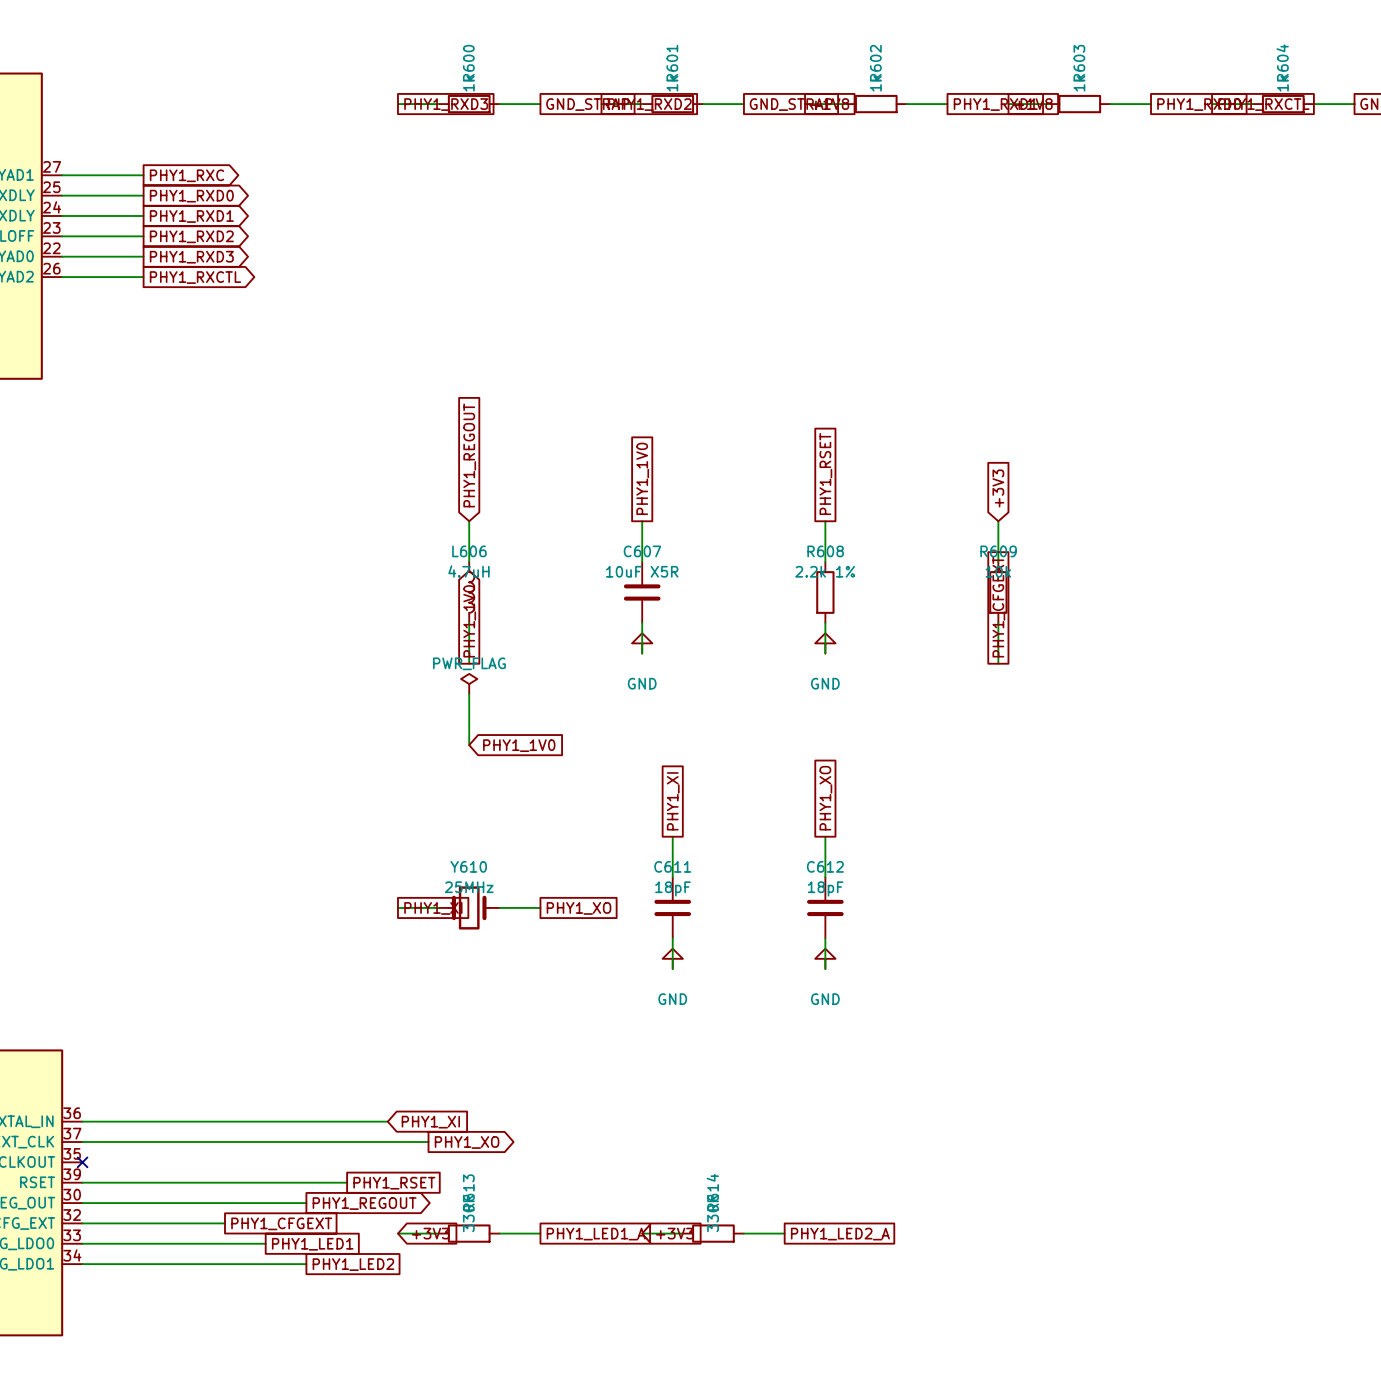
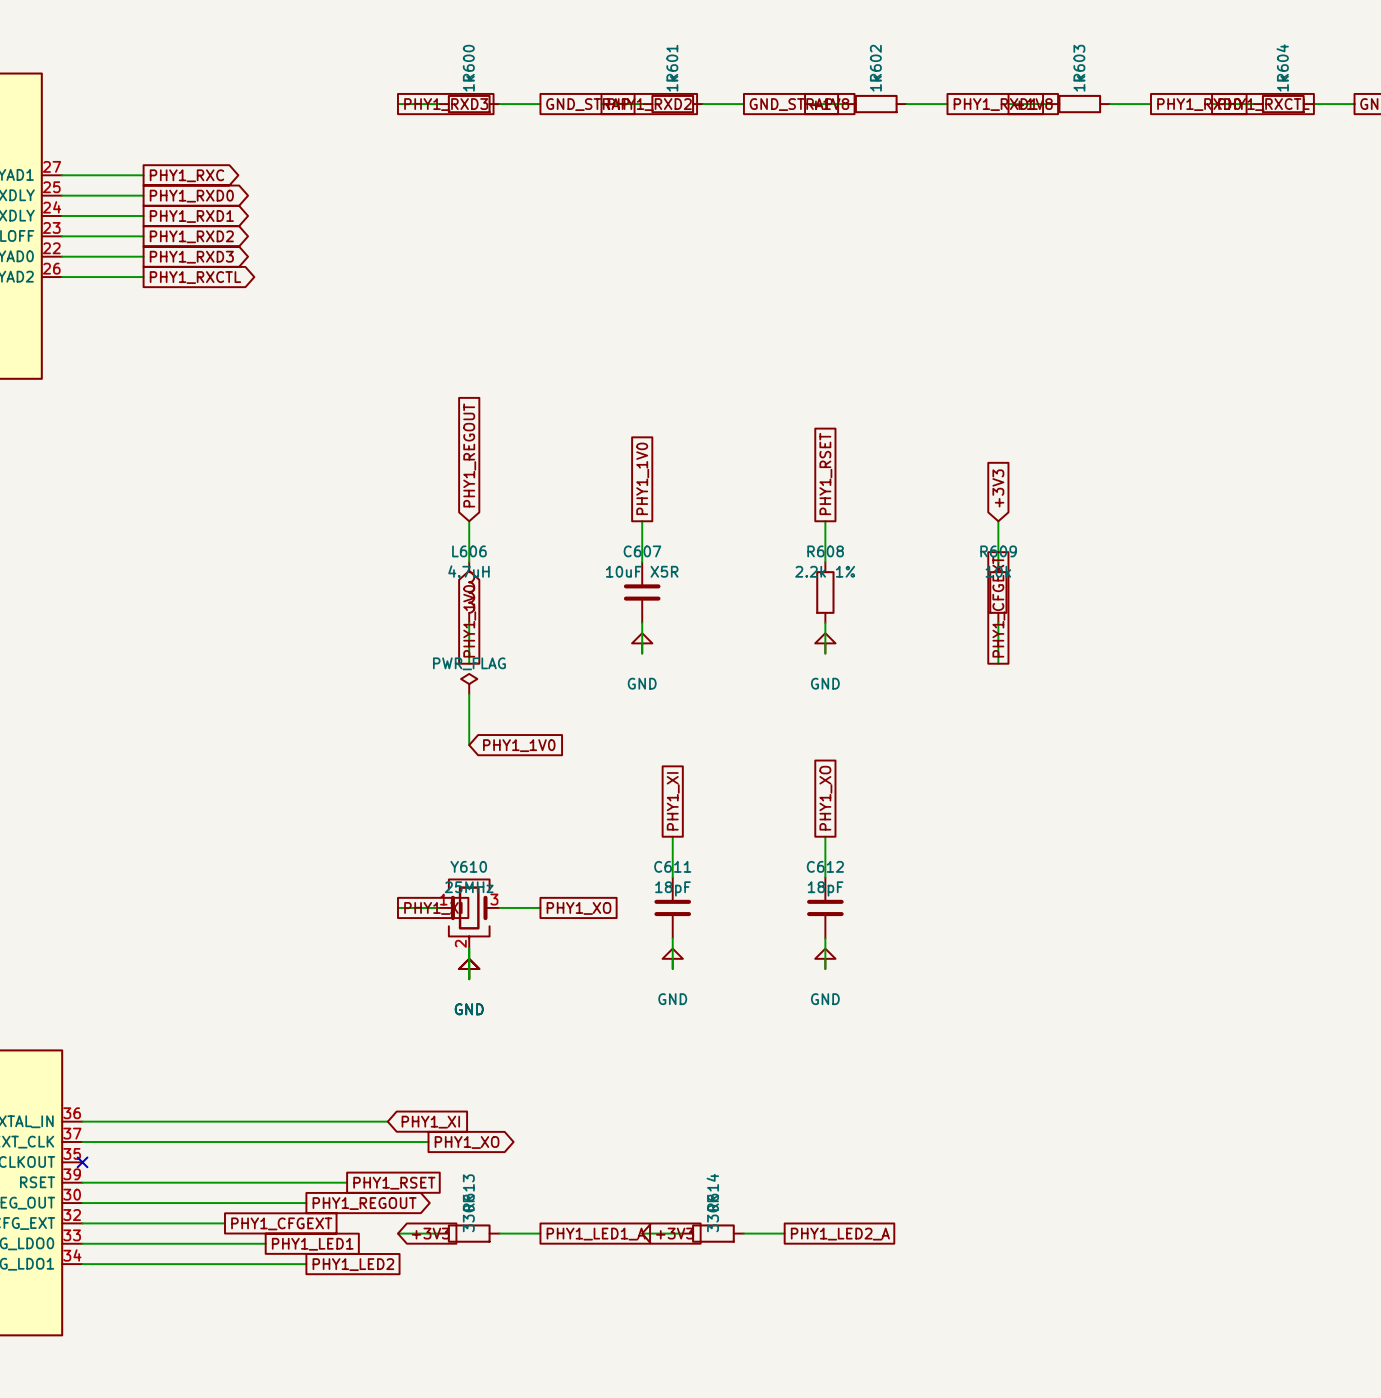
Y610 symbol: [438, 886, 500, 930] -> [438, 879, 500, 949]
wire: none -> (469, 948) (469, 979)
power symbol: none -> GND (469, 969)

